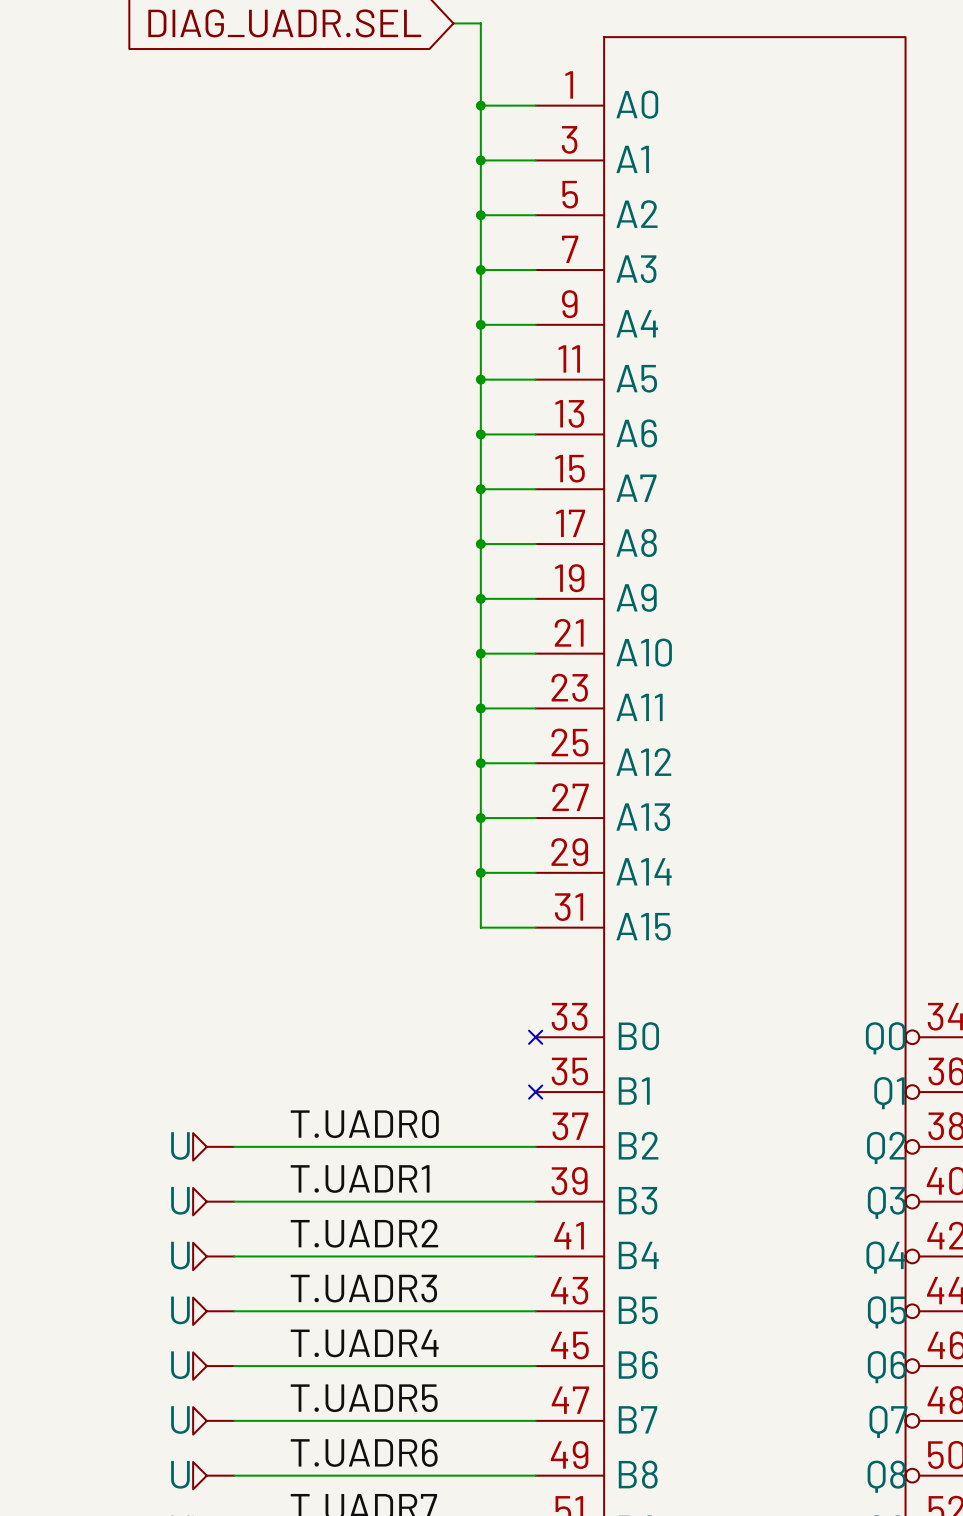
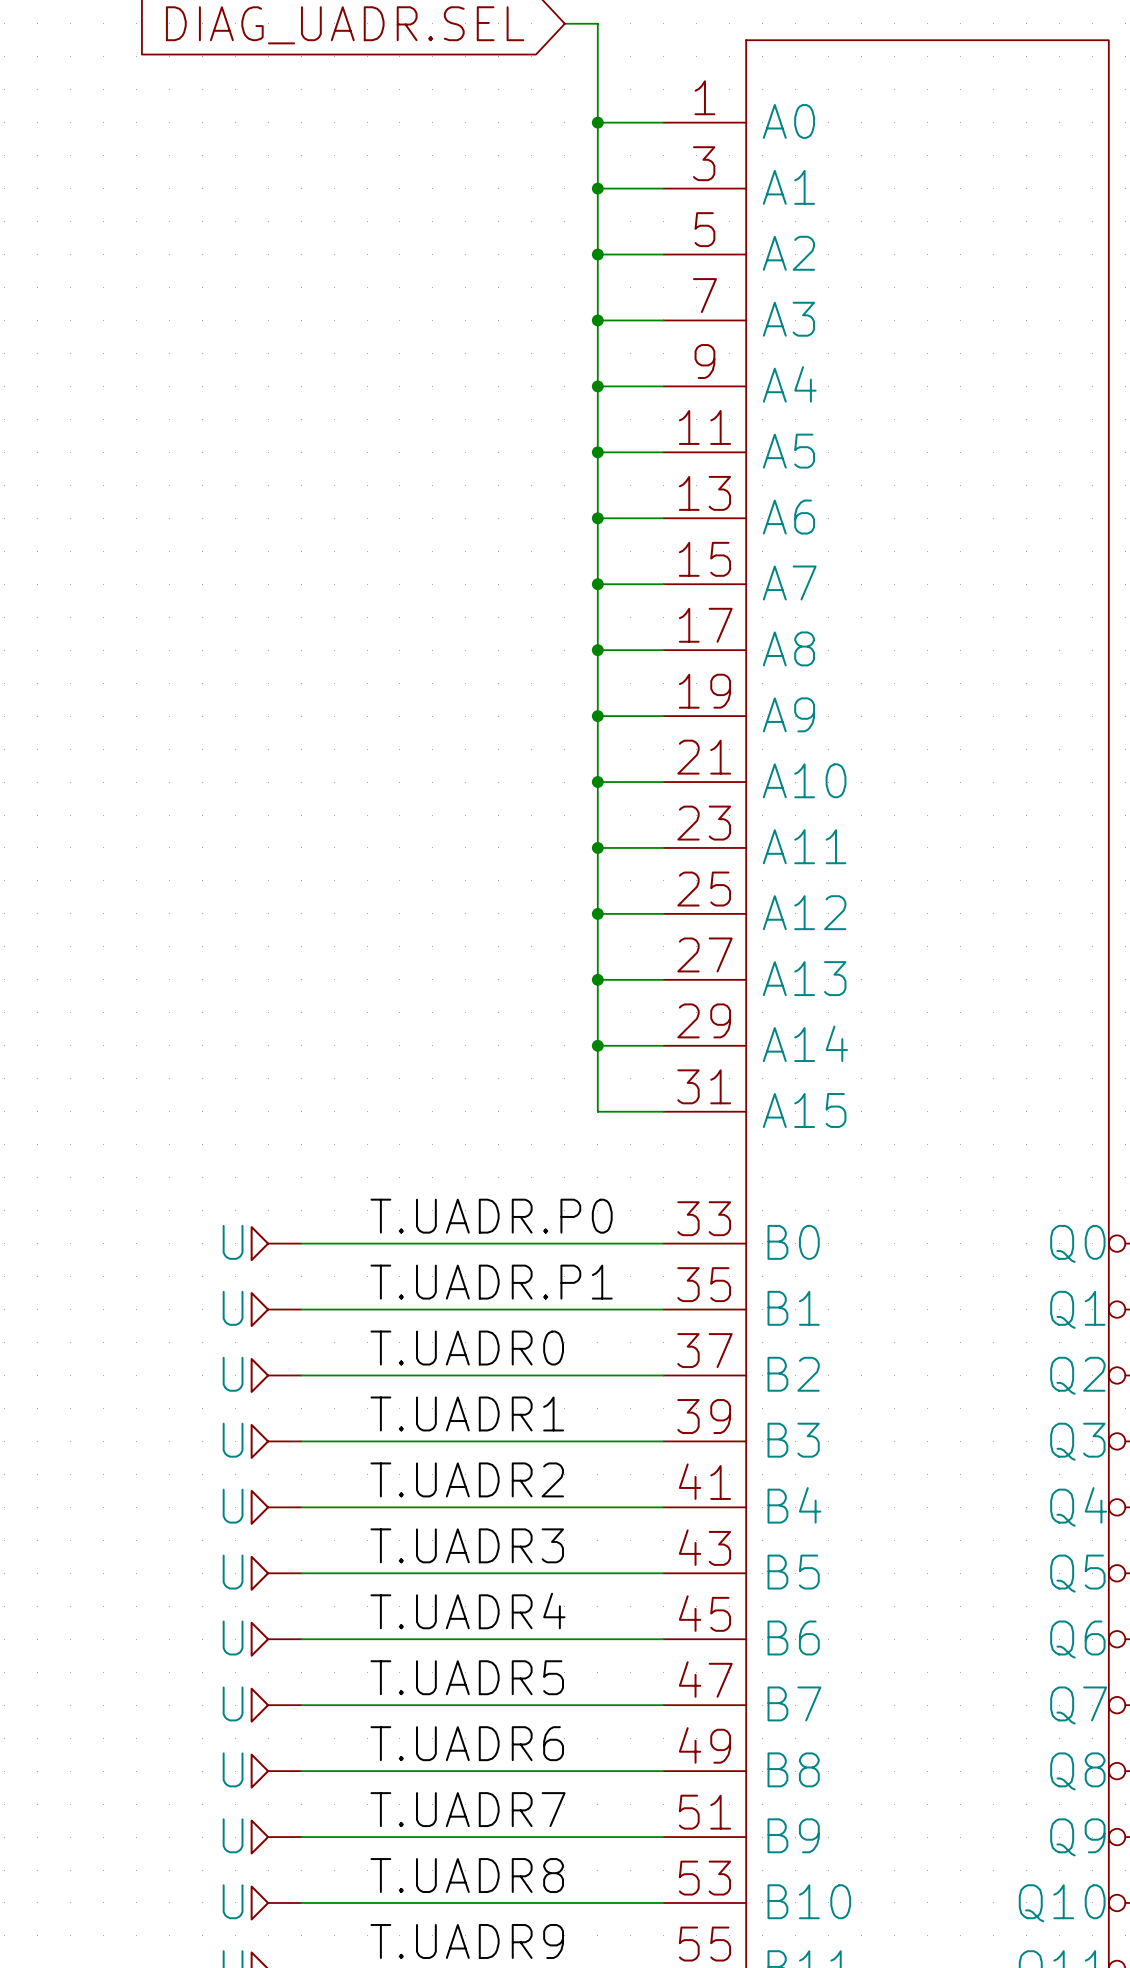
label: none -> T.UADR.P0 (491, 1216)
U: none -> (275, 1243)
wire: none -> (301, 1243) (663, 1243)
no-connect mark: (535, 1037) -> none
label: none -> T.UADR.P1 (491, 1282)
U: none -> (275, 1309)
wire: none -> (301, 1309) (663, 1309)
no-connect mark: (535, 1092) -> none

